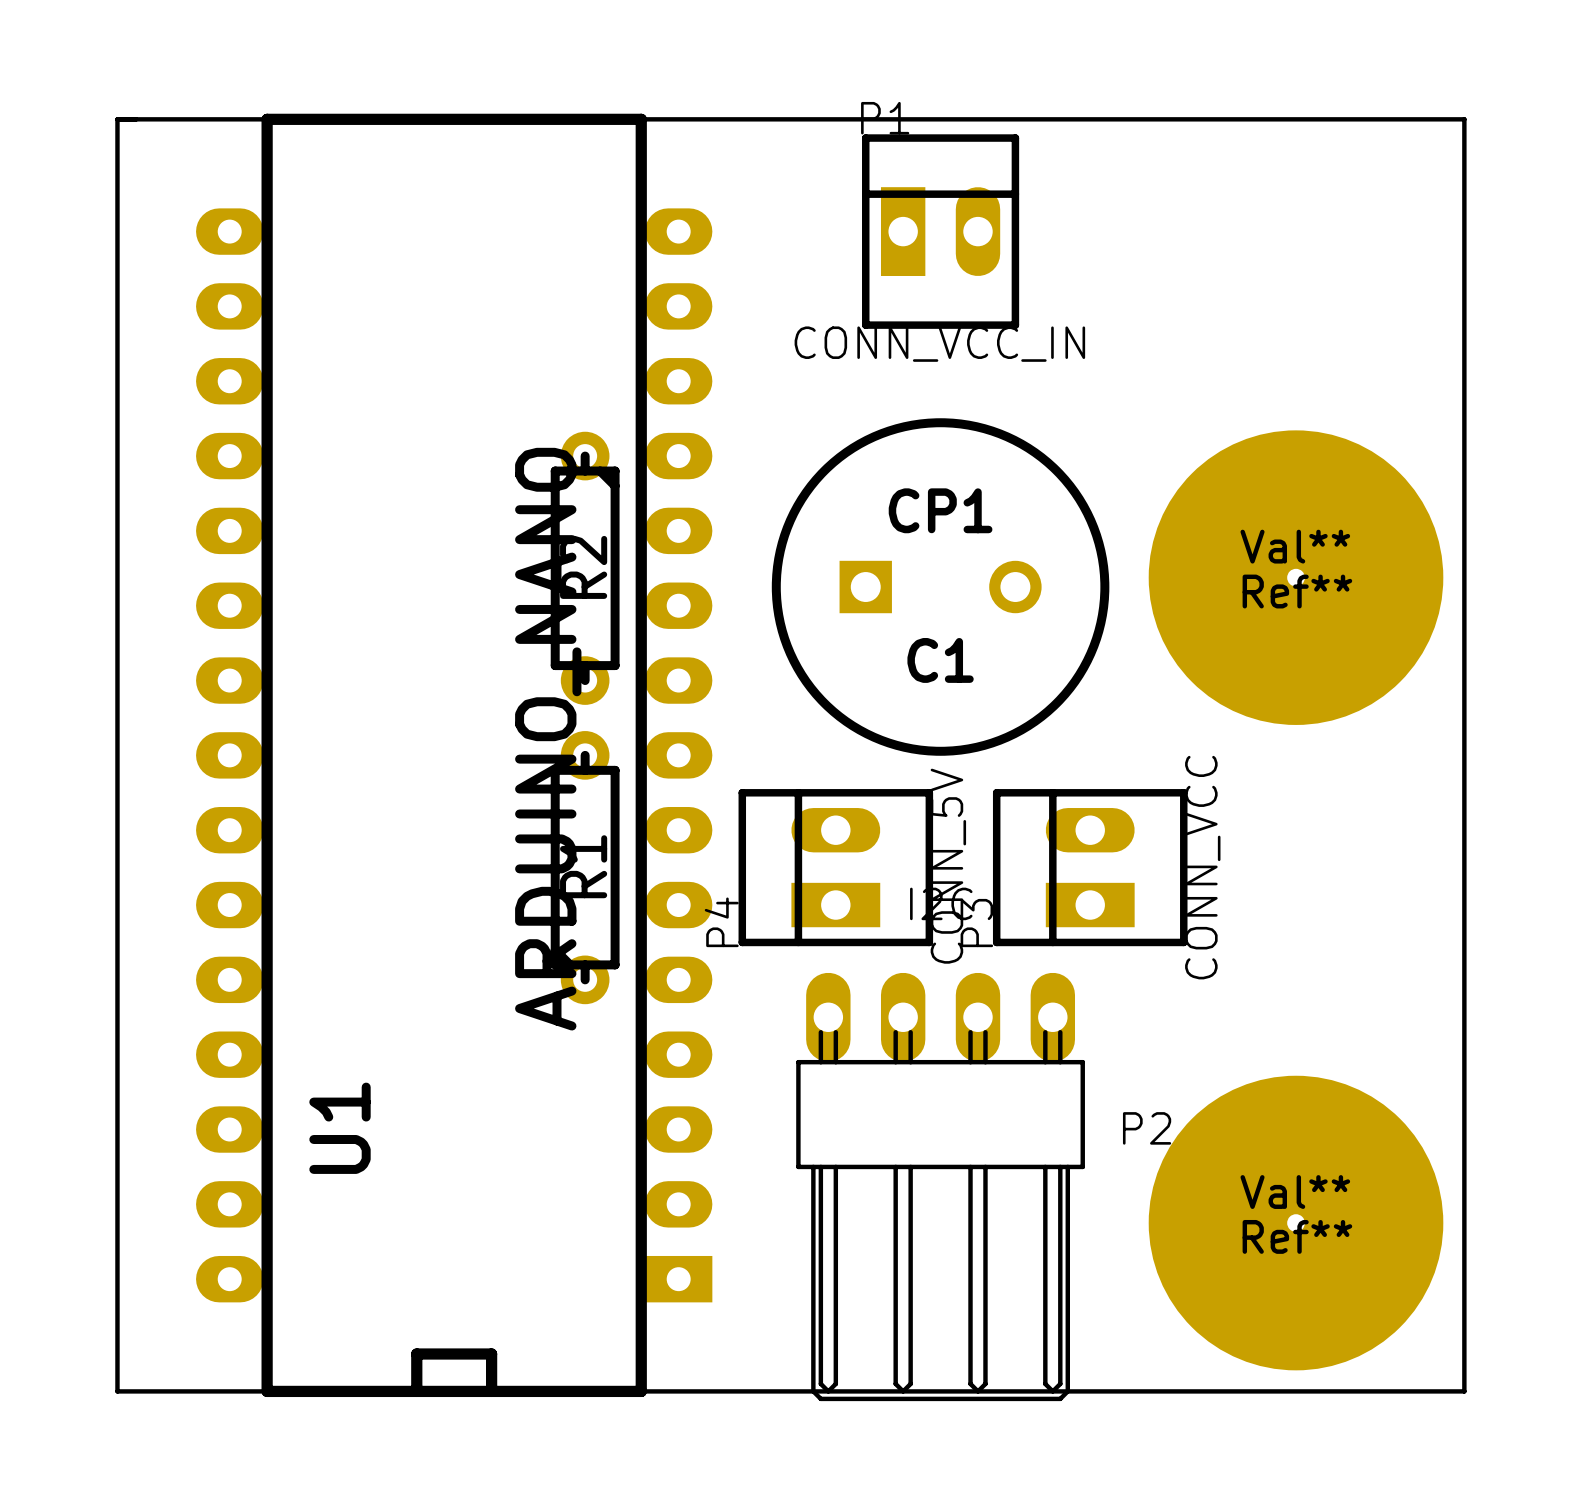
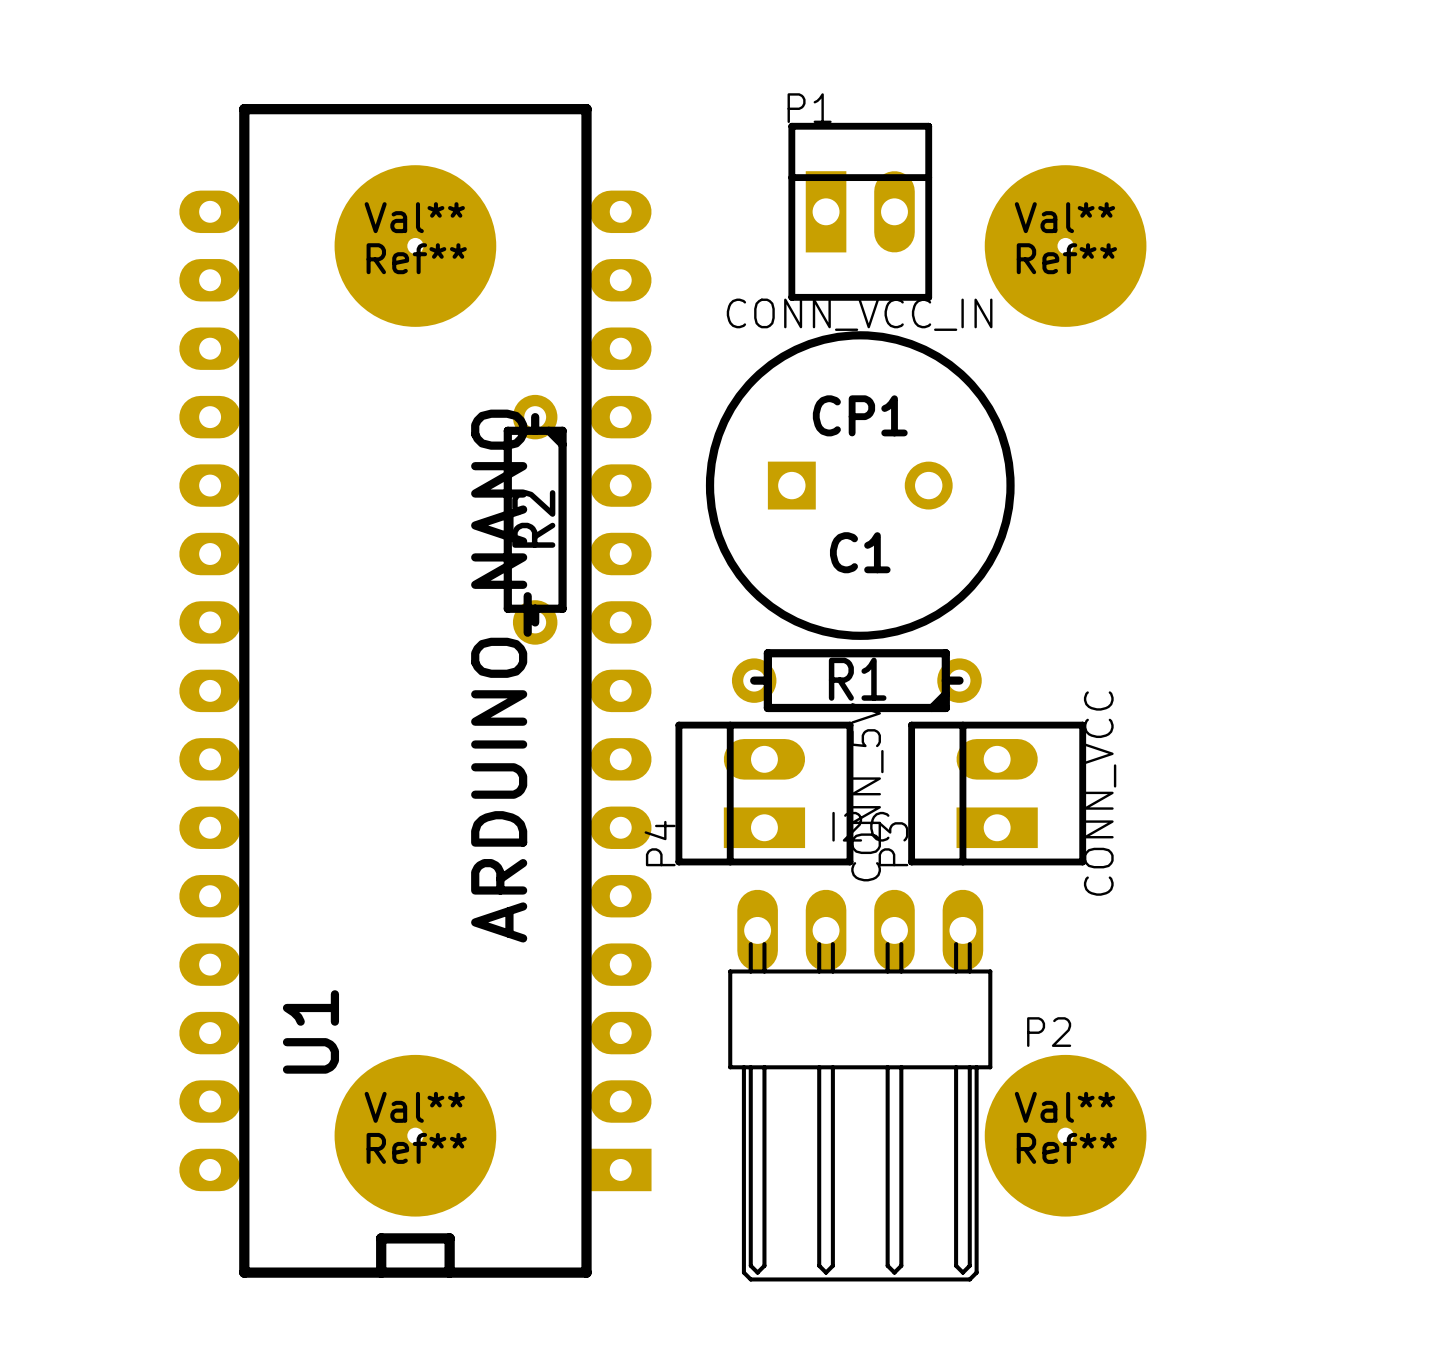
board edge: (117, 119) (1464, 119) (1464, 1391) (117, 1391) (117, 119) -> none
Ref**: none -> Val** (415, 246)
Ref**: none -> Val** (1065, 246)
Ref**: Val** (1296, 577) -> none
C1 position: (940, 587) -> (860, 485)
R1 rotation: 0° (585, 867) -> 90° counterclockwise (856, 680)
R1 position: (585, 867) -> (856, 680)
Ref**: Val** (1296, 1223) -> none
Ref**: none -> Val** (415, 1135)
Ref**: none -> Val** (1065, 1135)

